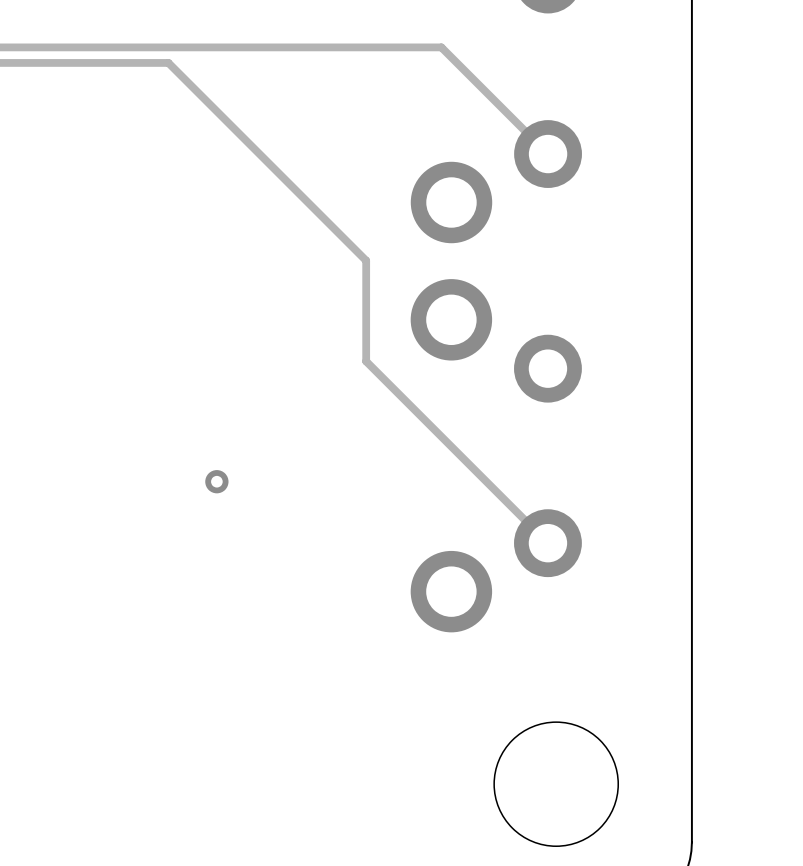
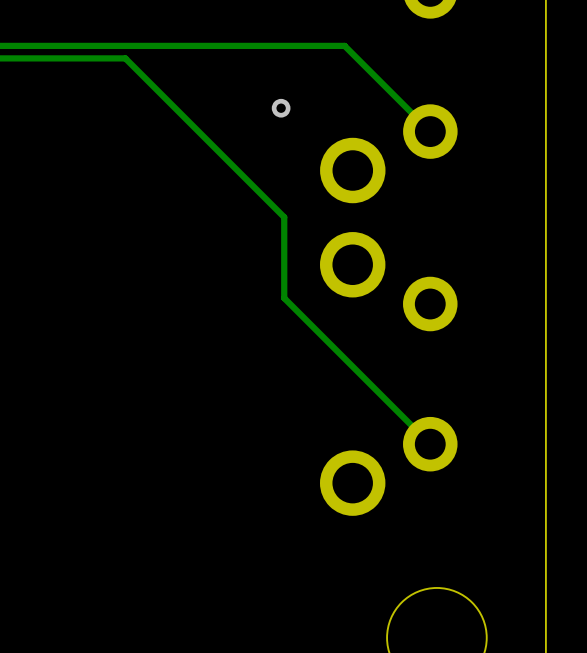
via: none -> (281, 108)
via: (216, 481) -> none

